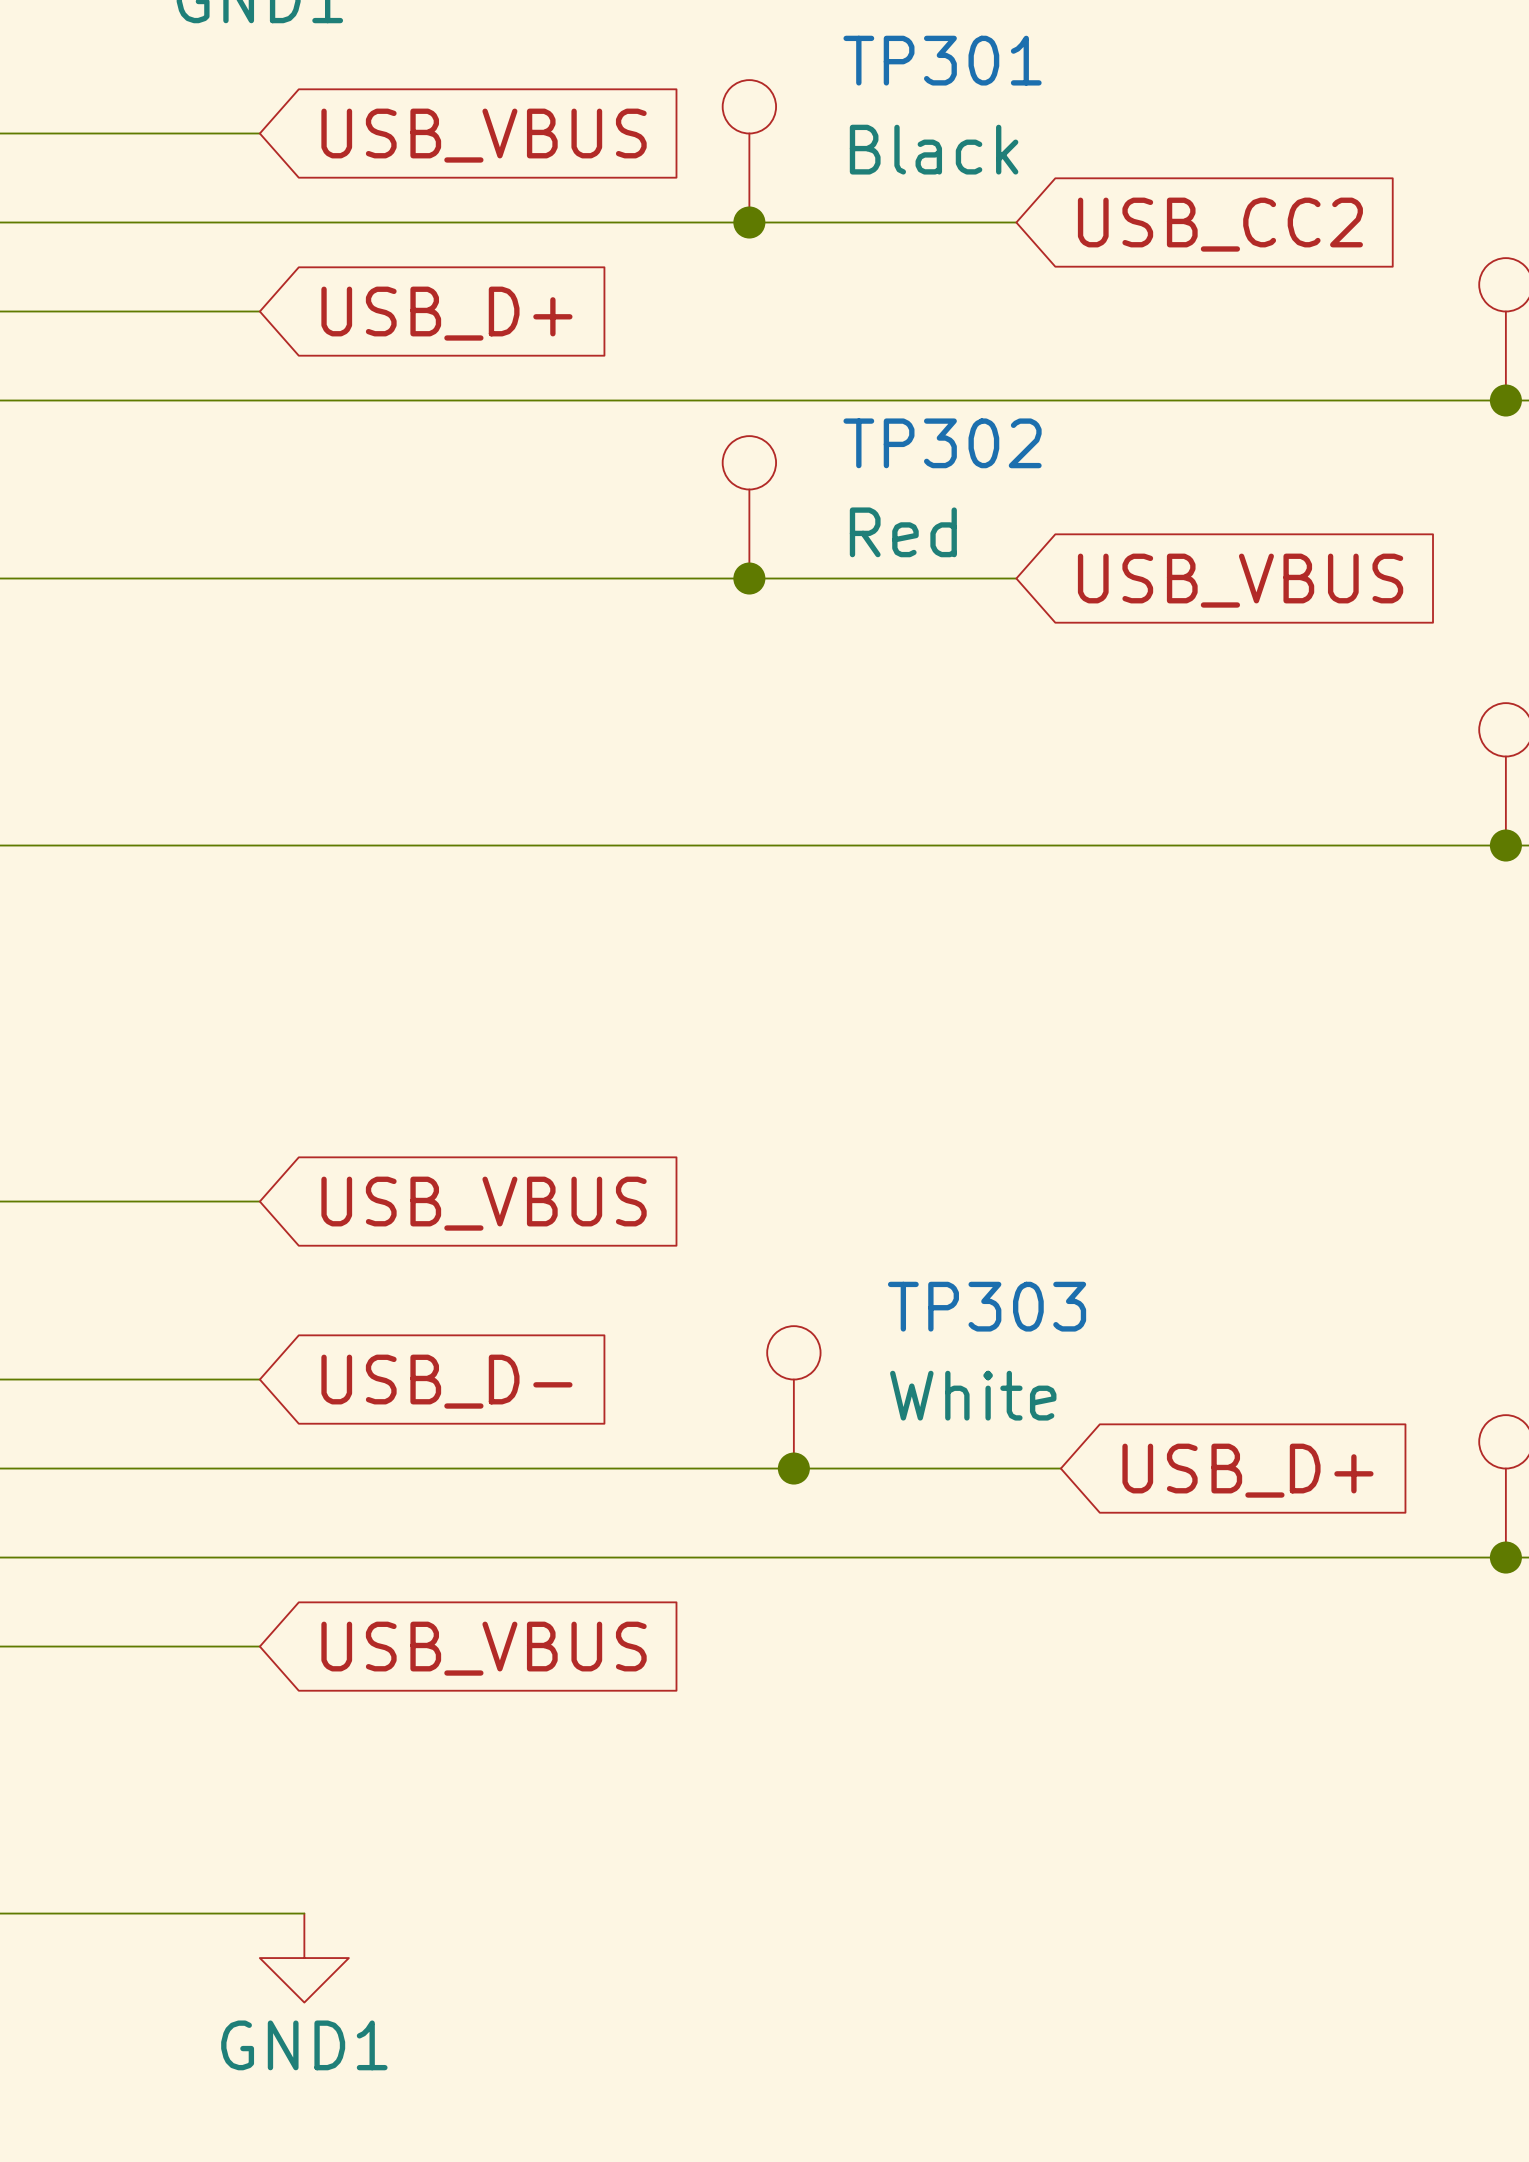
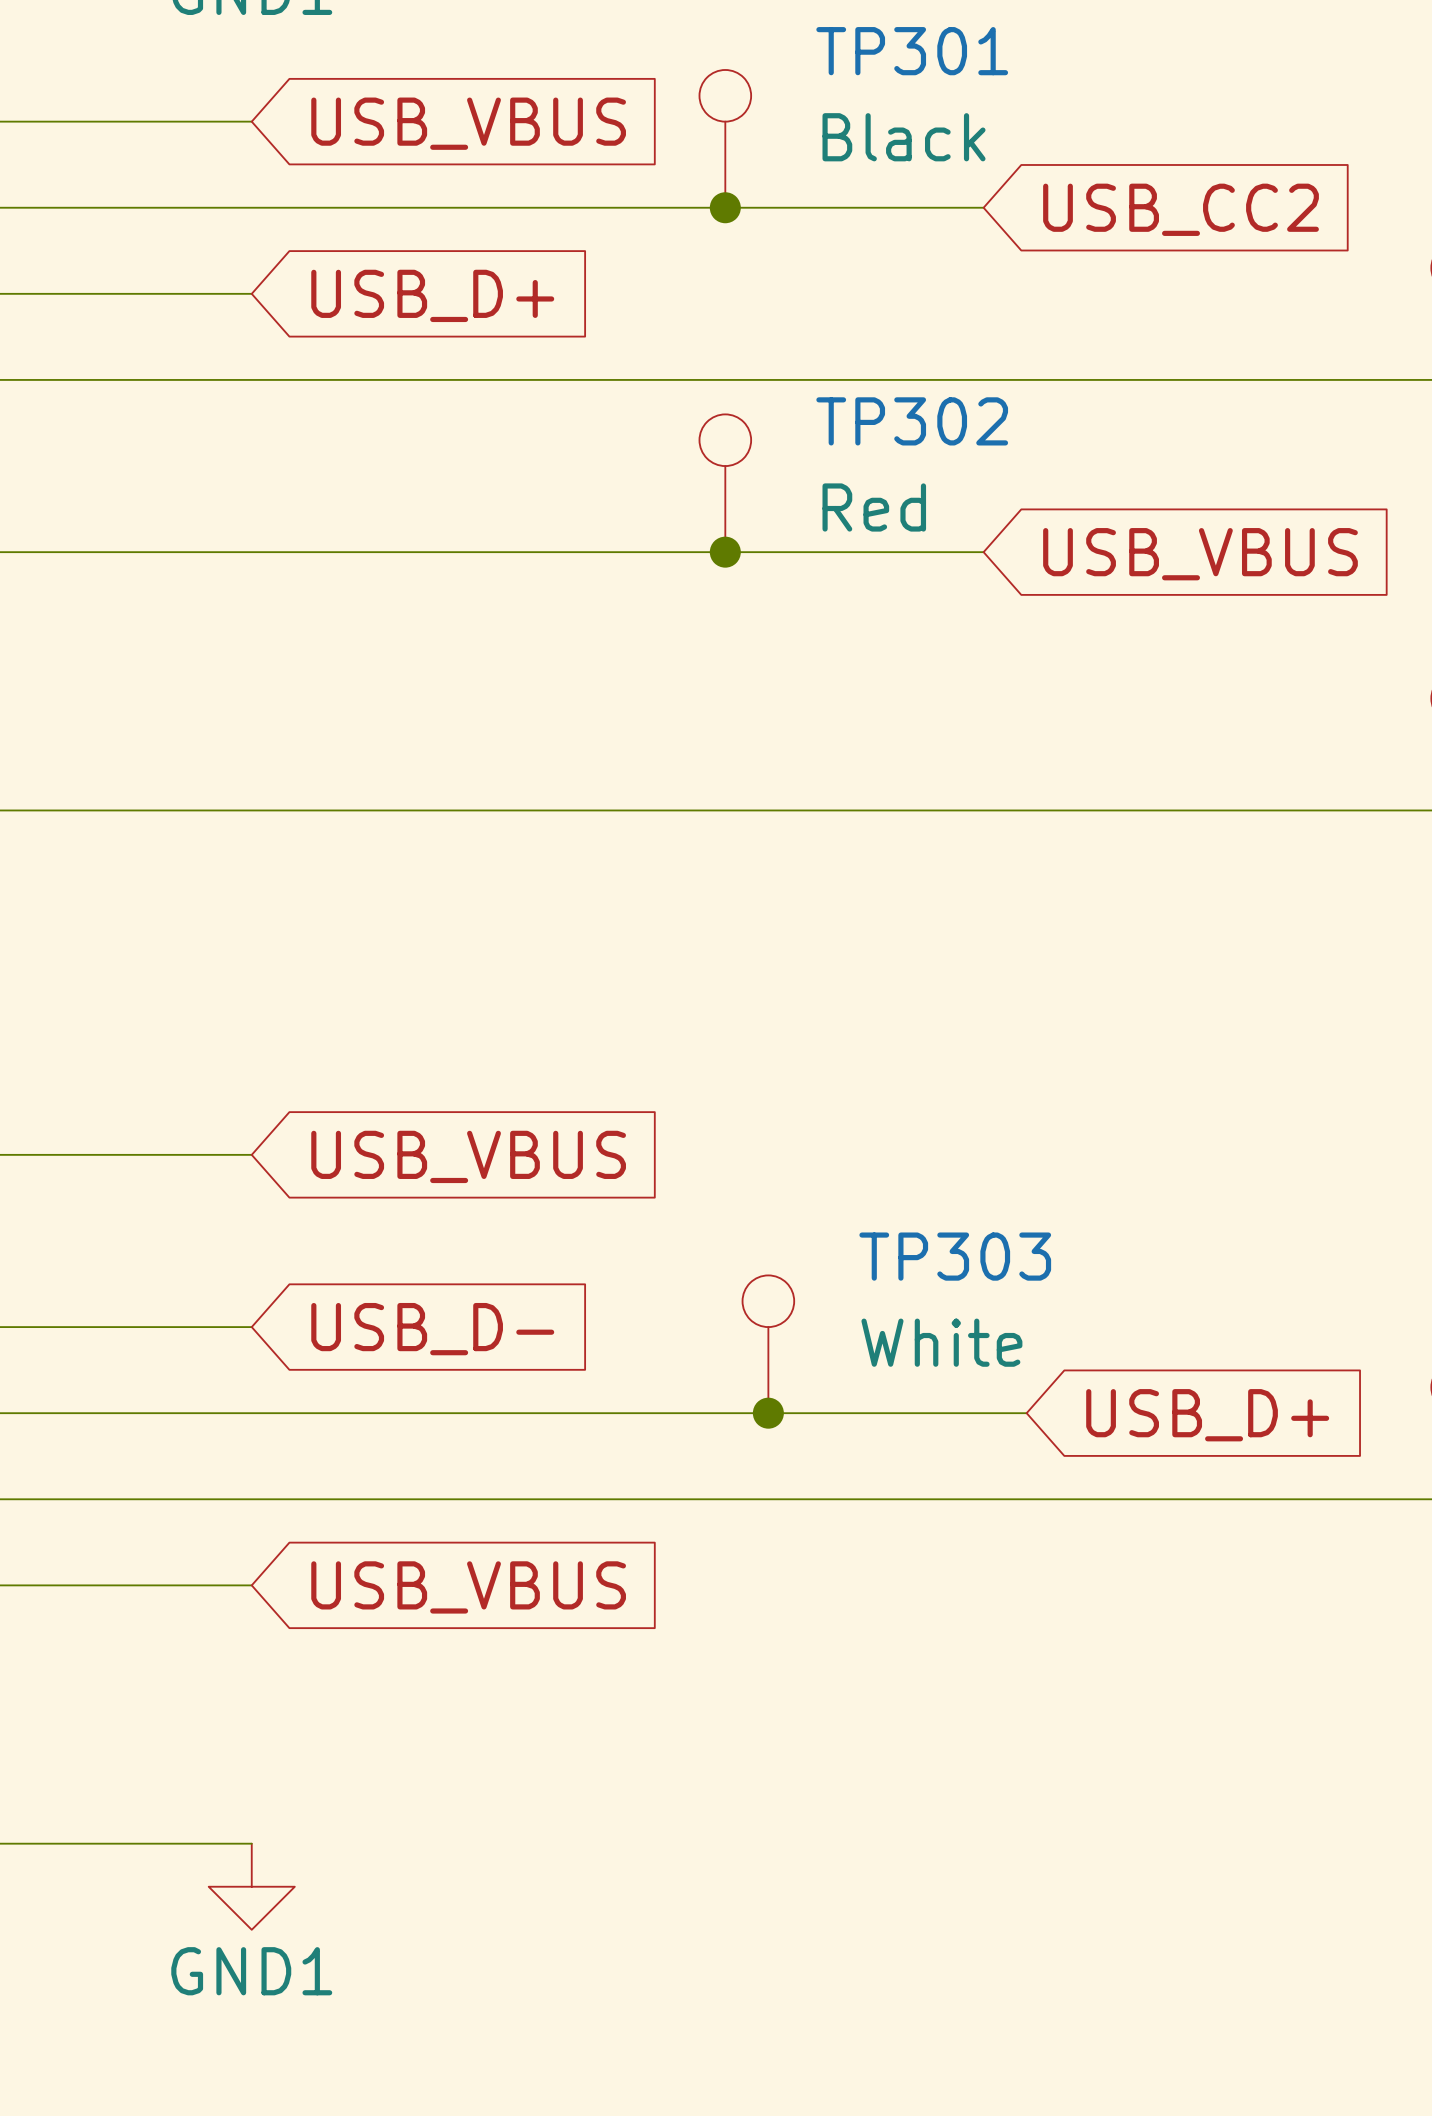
wire: (259, 1913) (304, 1913) -> none
power symbol position: GND1 (304, 1958) -> GND1 (251, 1886)

